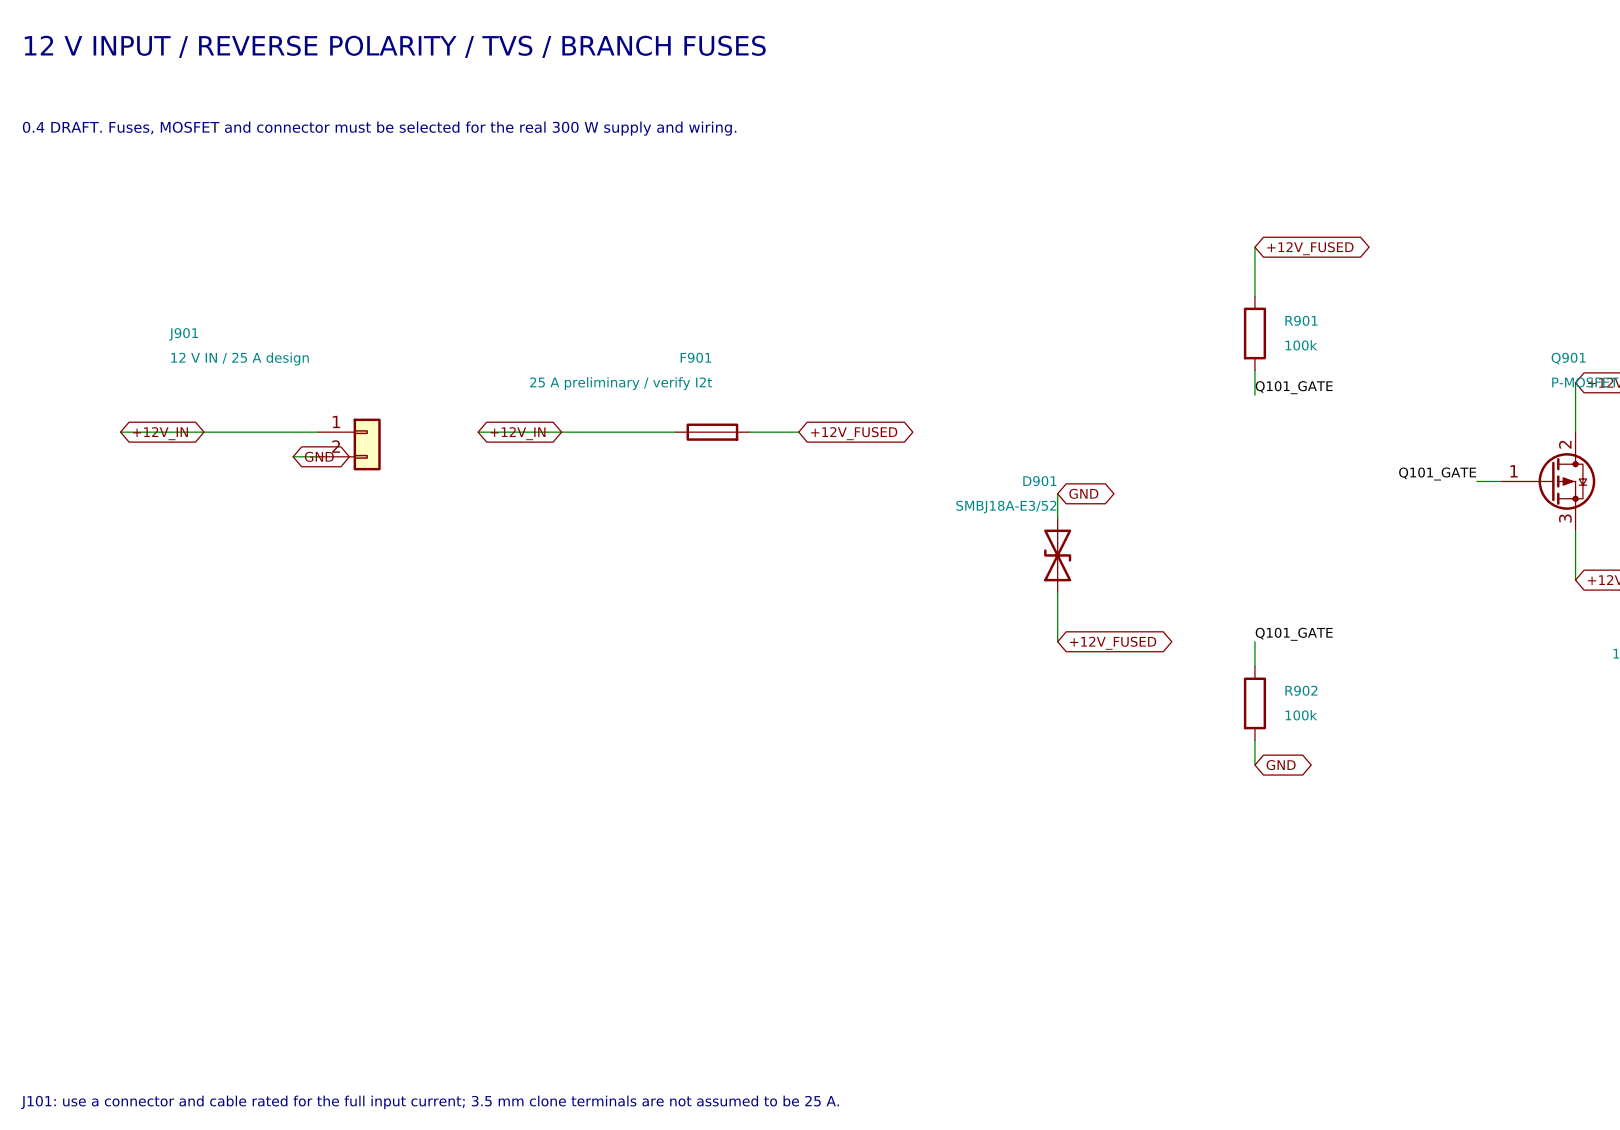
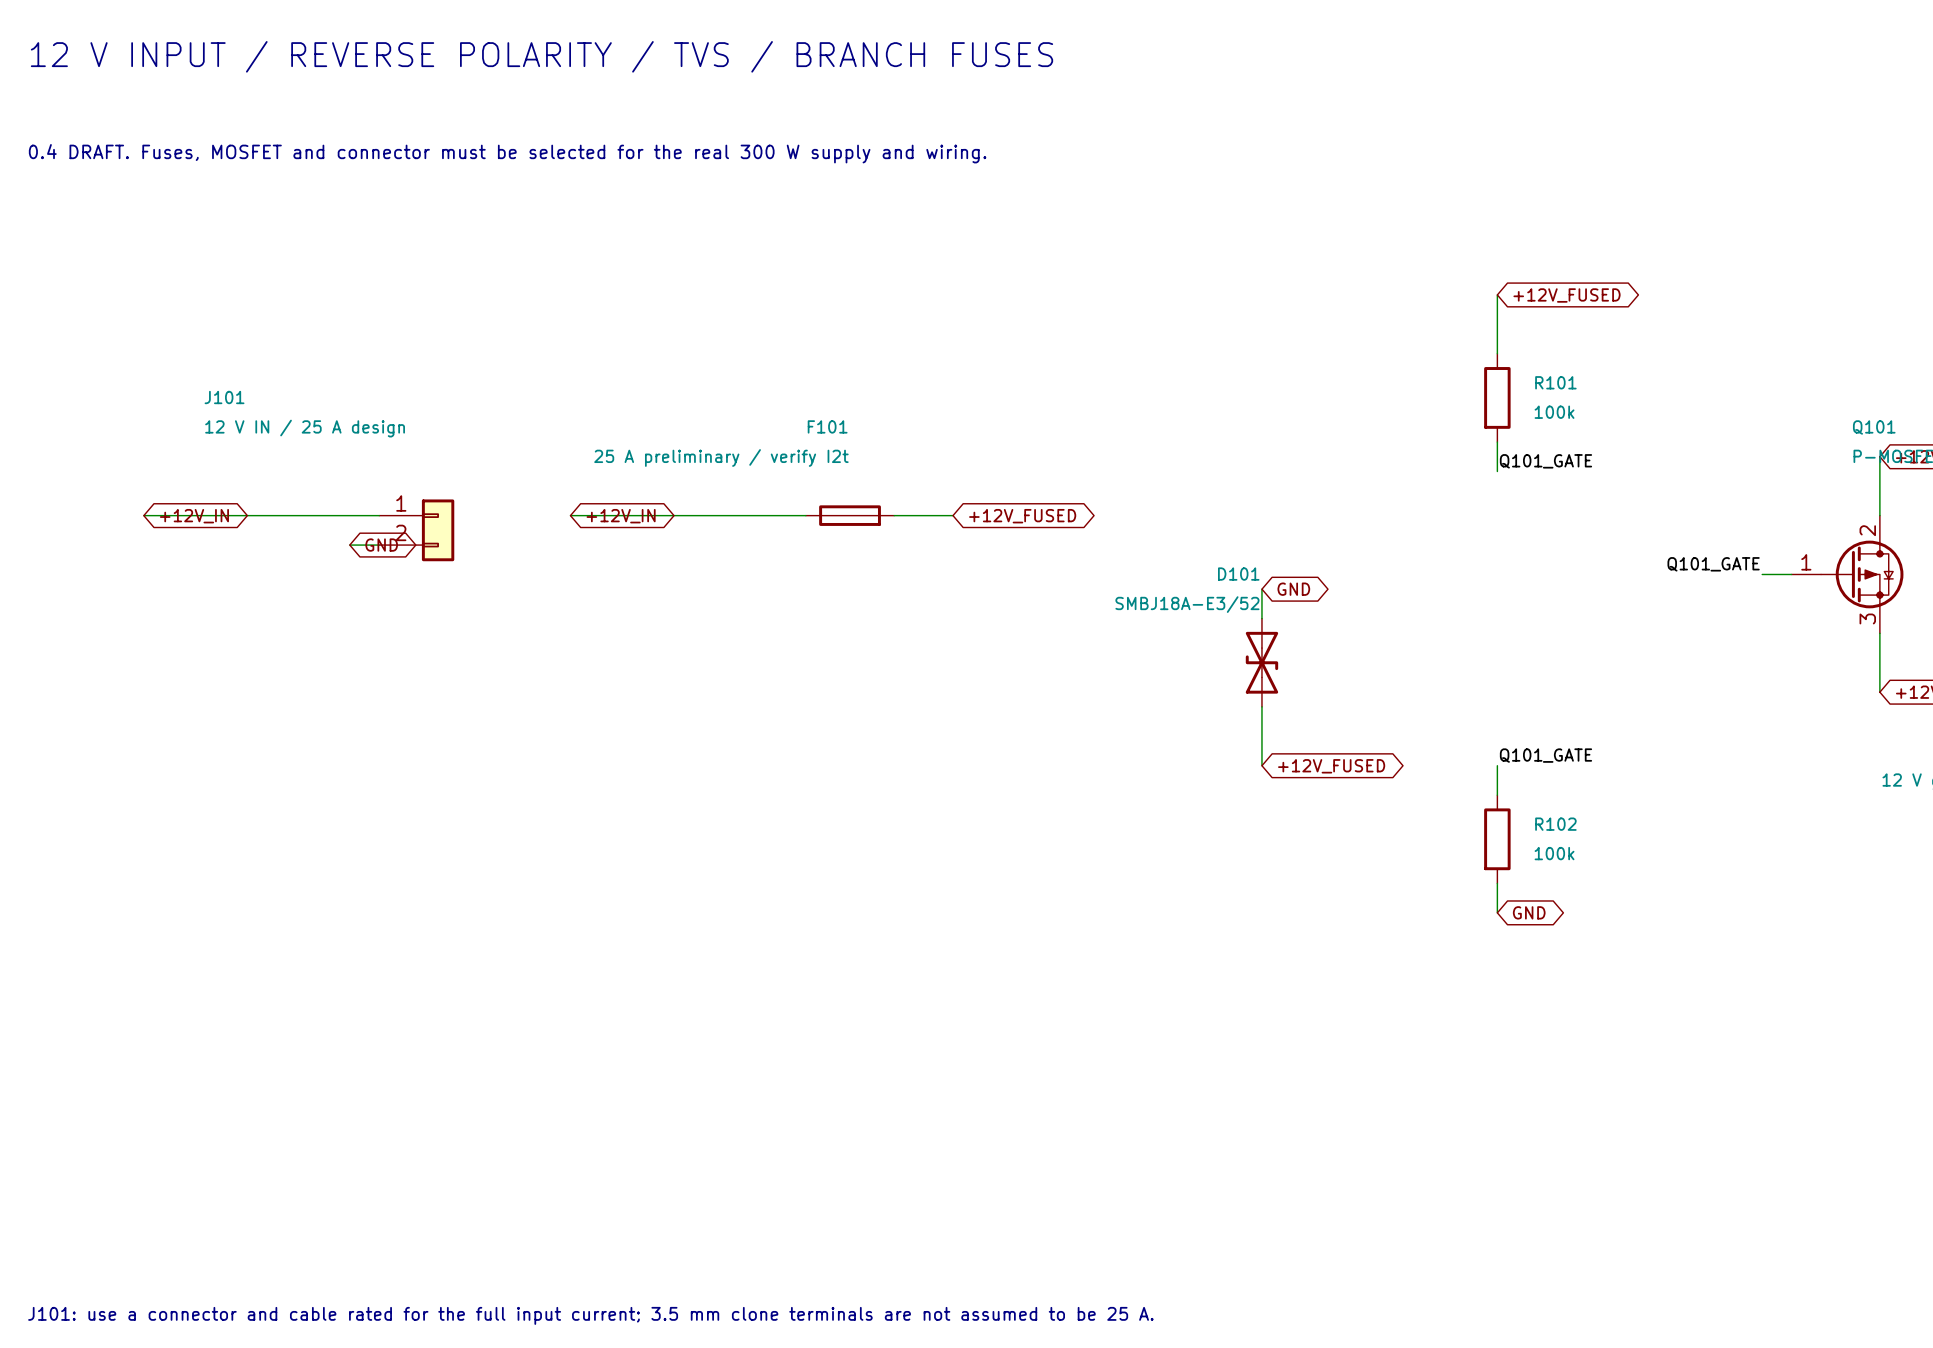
R901 name: R901 (1301, 320) -> R101 (1555, 382)
J901 name: J901 (183, 334) -> J101 (224, 397)
F901 name: F901 (695, 357) -> F101 (827, 426)
Q901 name: Q901 (1568, 358) -> Q101 (1874, 427)
D901 name: D901 (1039, 481) -> D101 (1238, 574)
R902 name: R902 (1301, 690) -> R102 (1555, 824)

